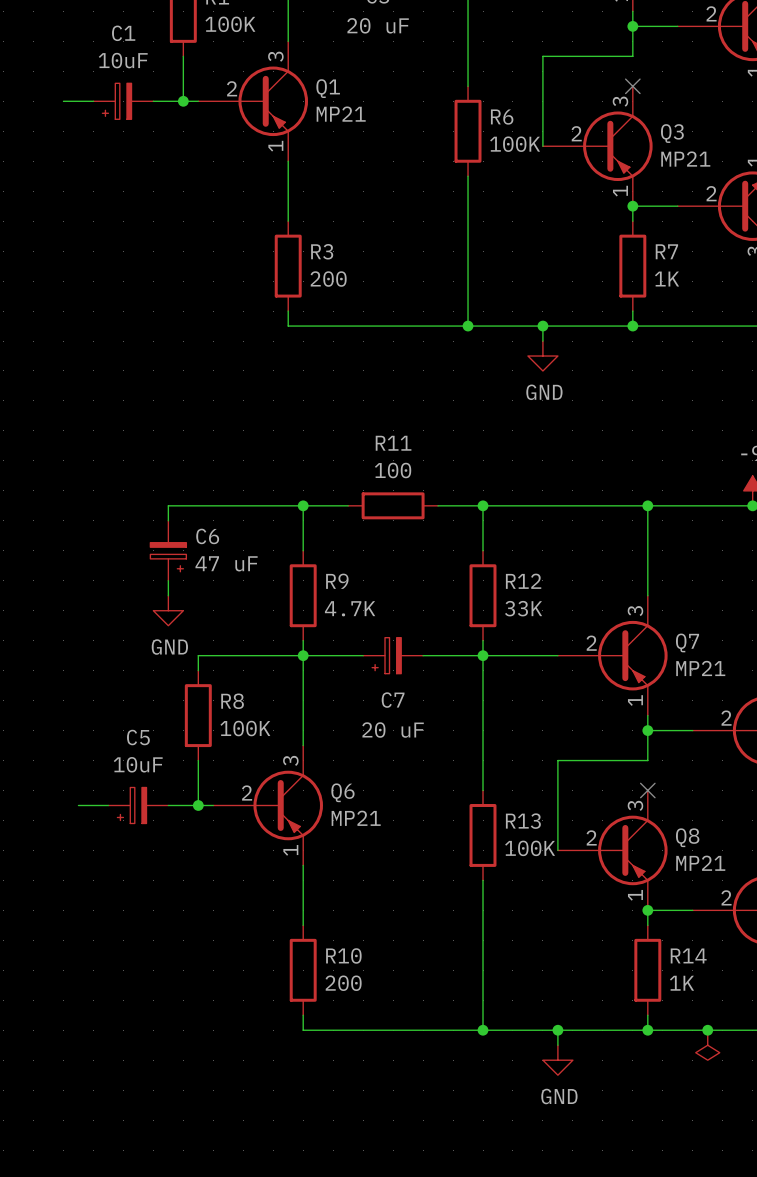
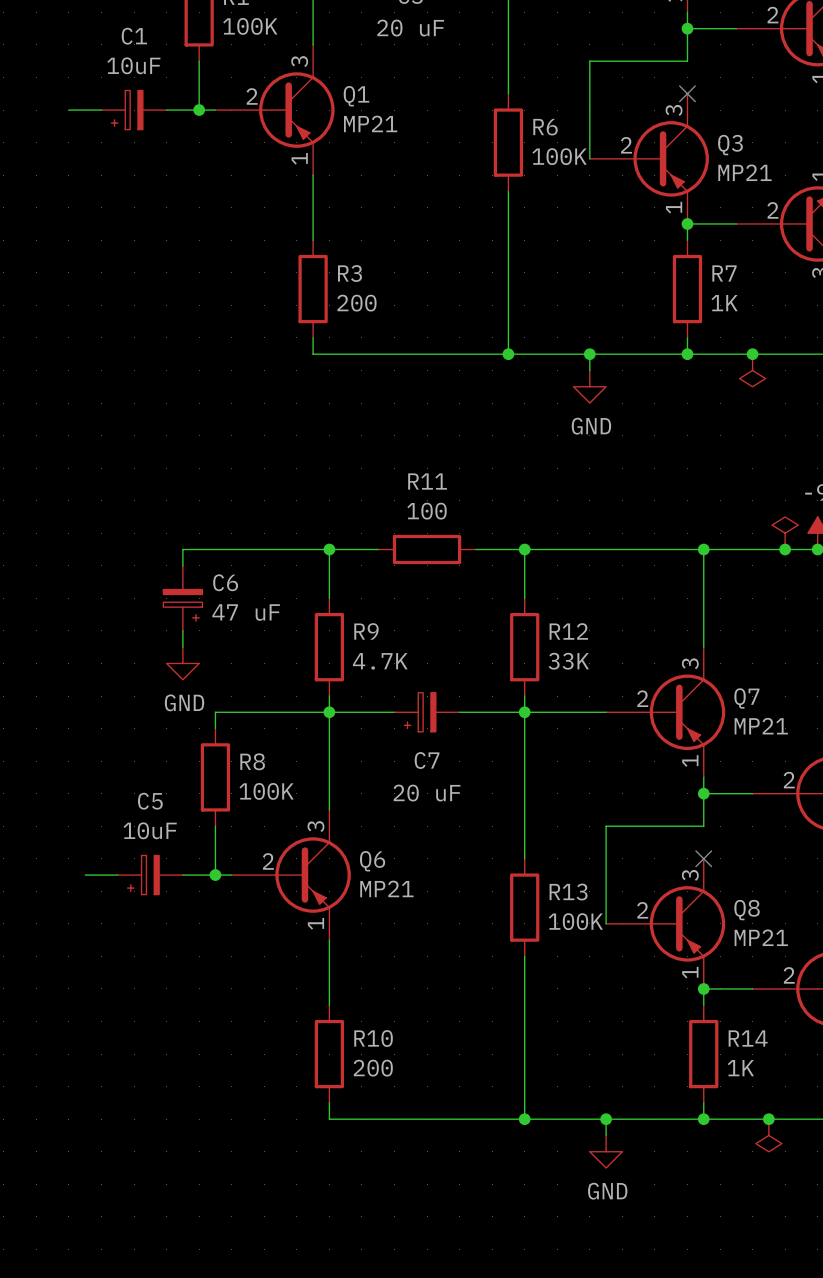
junction: none -> (752, 354)
power symbol: none -> (752, 370)
power symbol: none -> (785, 533)
junction: none -> (785, 549)

